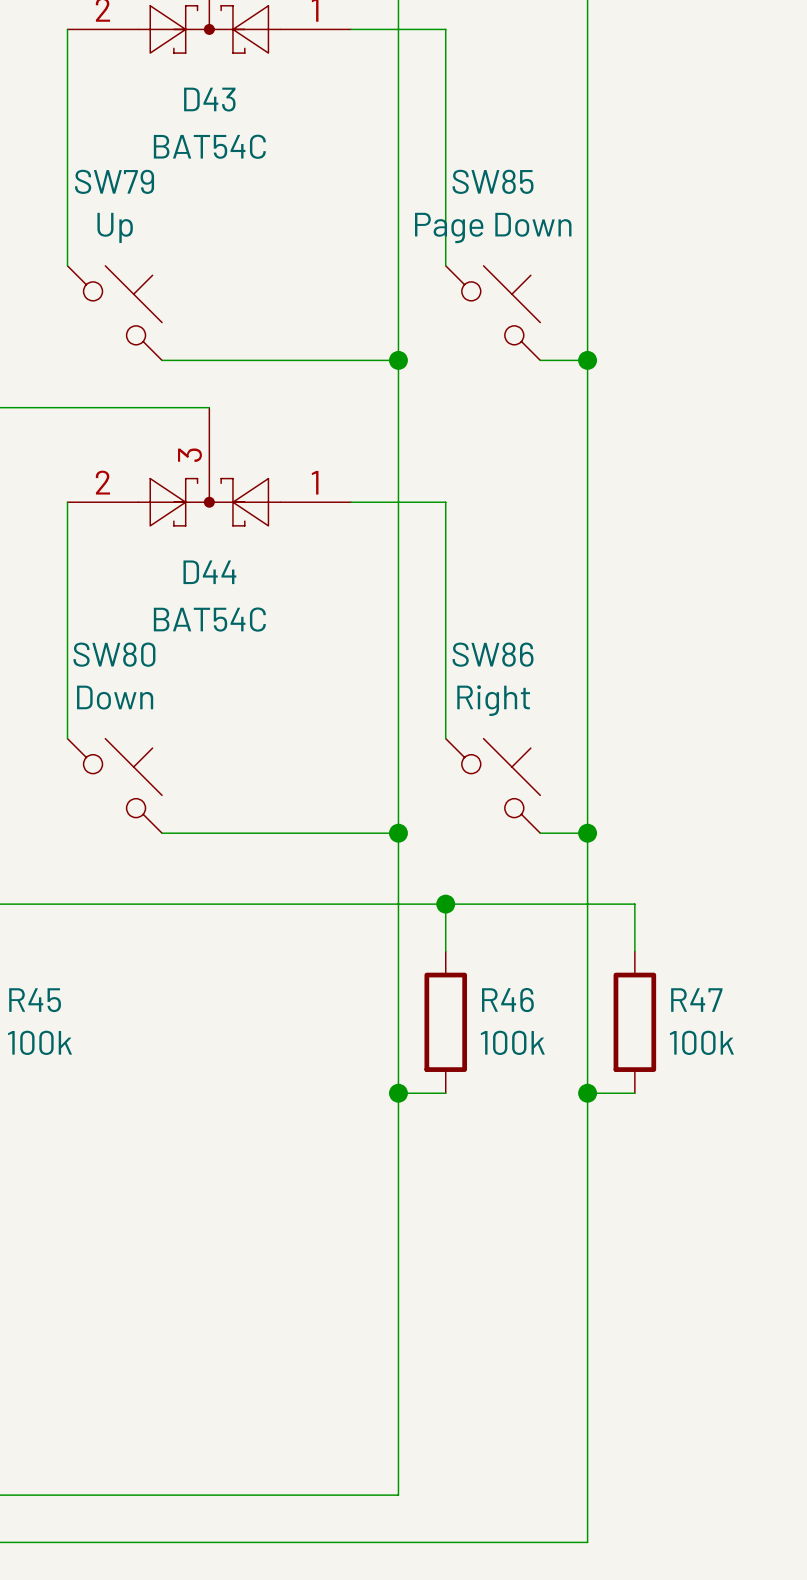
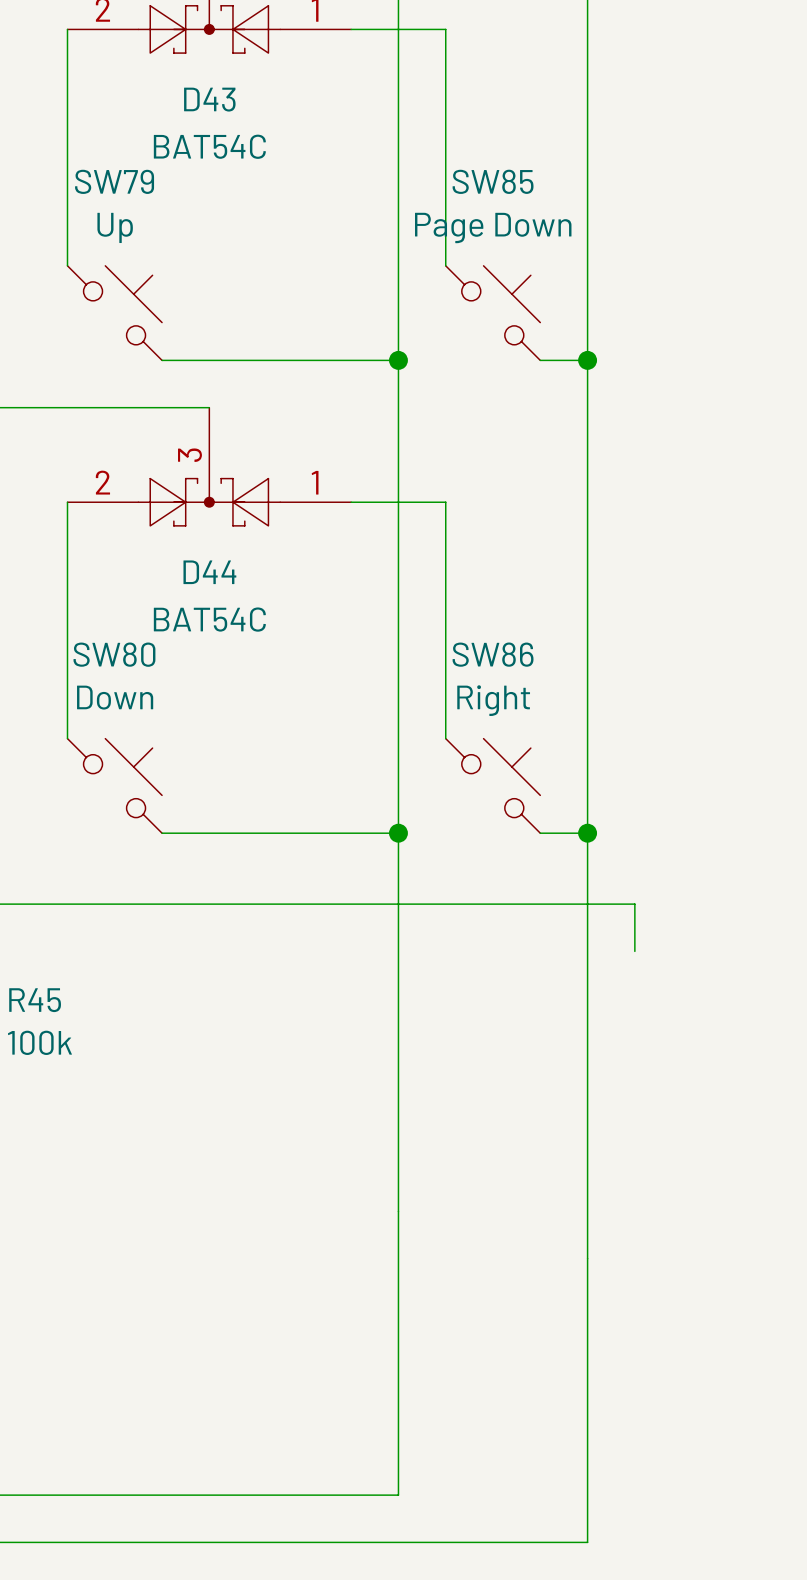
wire: (445, 904) (445, 951) -> none
junction: (445, 904) -> none
R46: 100k (445, 1022) -> none
R47: 100k (634, 1022) -> none
wire: (398, 1093) (445, 1093) -> none
junction: (398, 1093) -> none
wire: (587, 1093) (634, 1093) -> none
junction: (587, 1093) -> none

